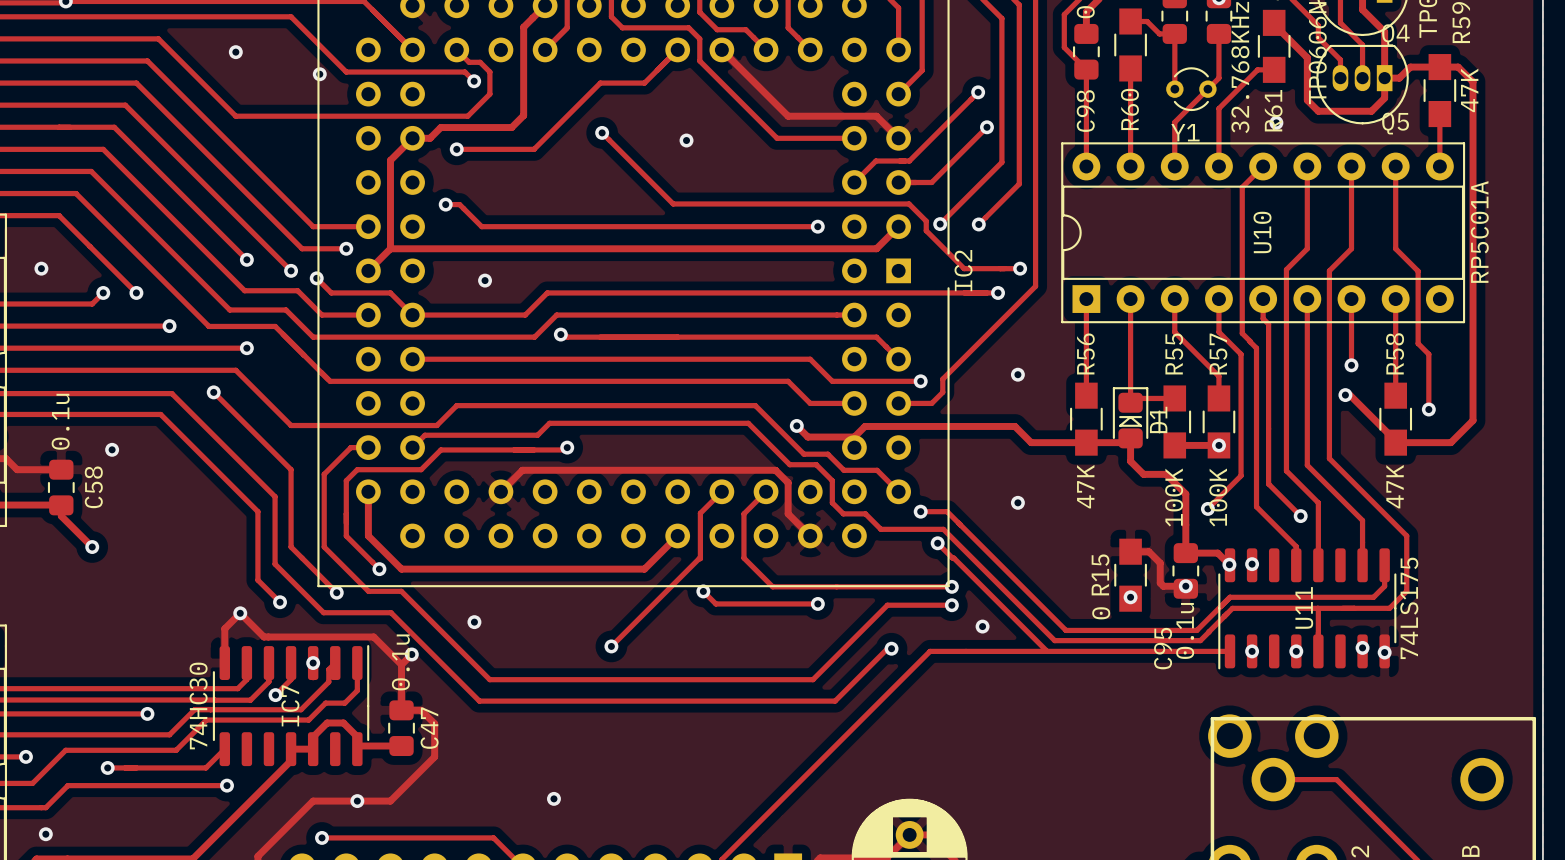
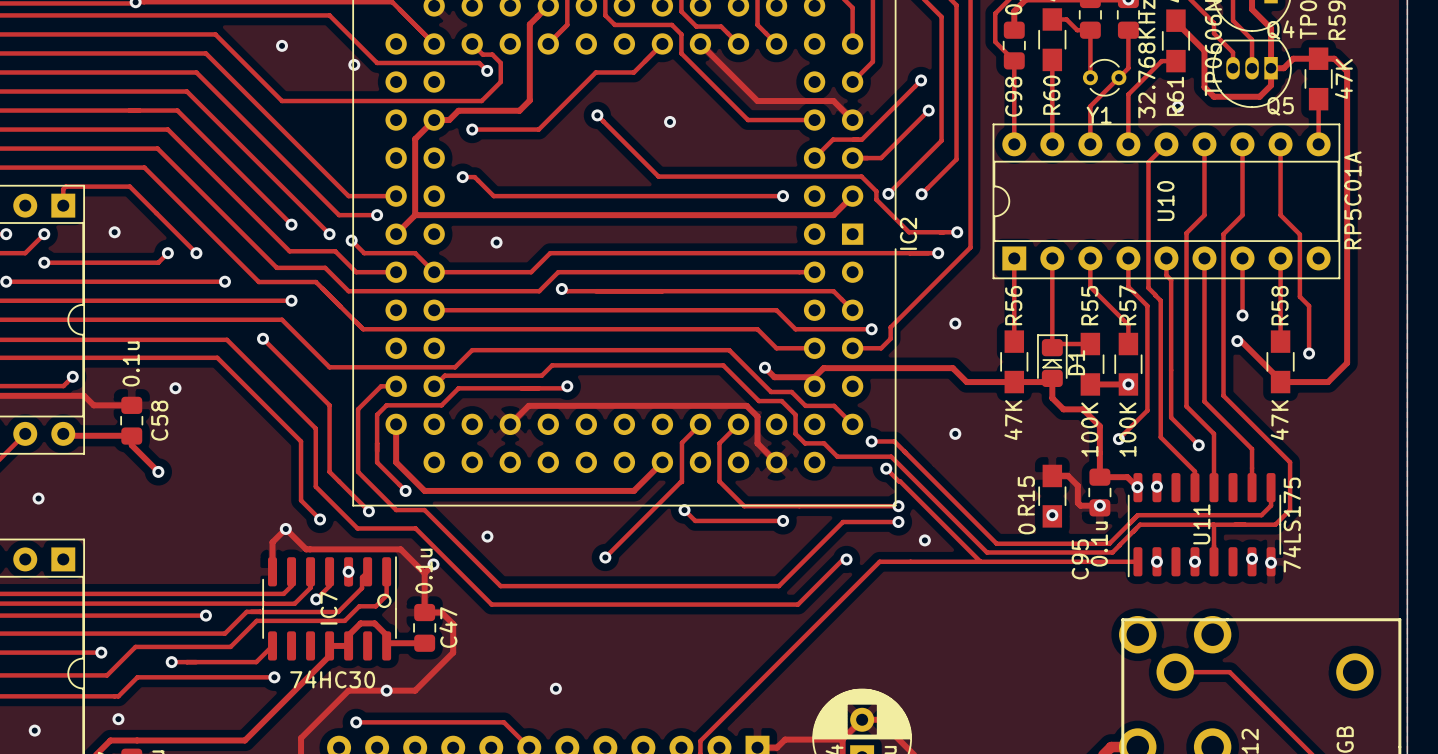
drawing: none -> [377, 593, 392, 609]
IC7 value rotation: 0° (198, 705) -> 90° clockwise (332, 679)
IC7 value position: 74HC30 (198, 705) -> 74HC30 (332, 679)

